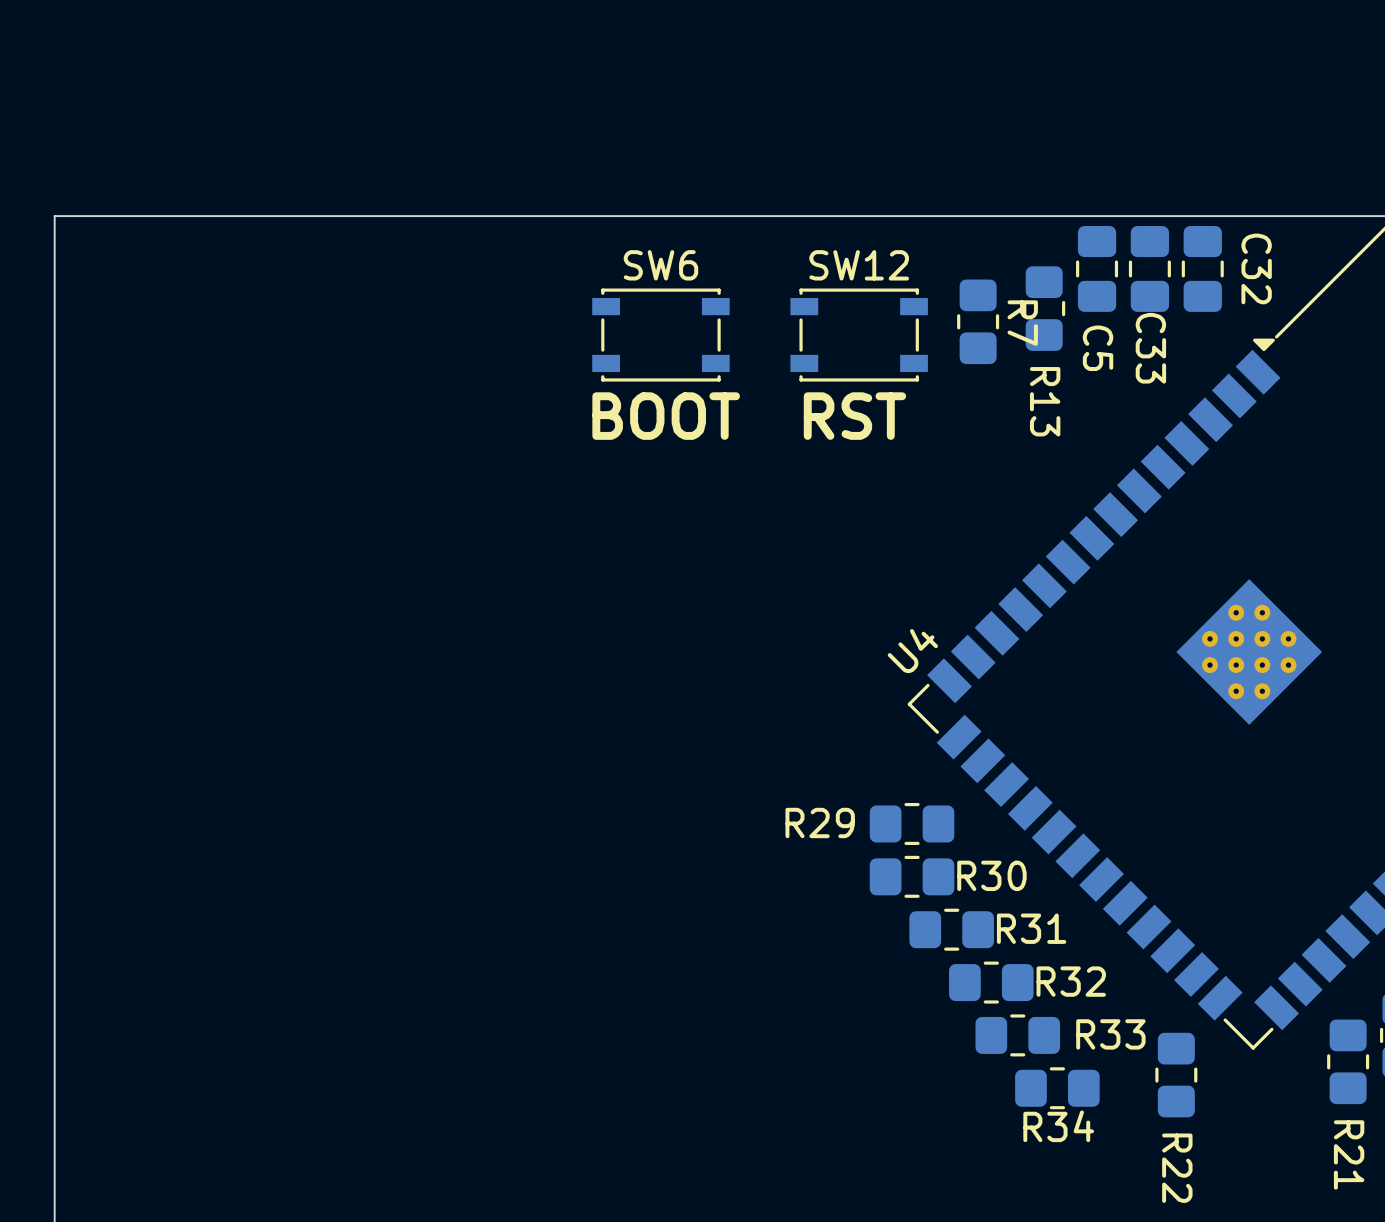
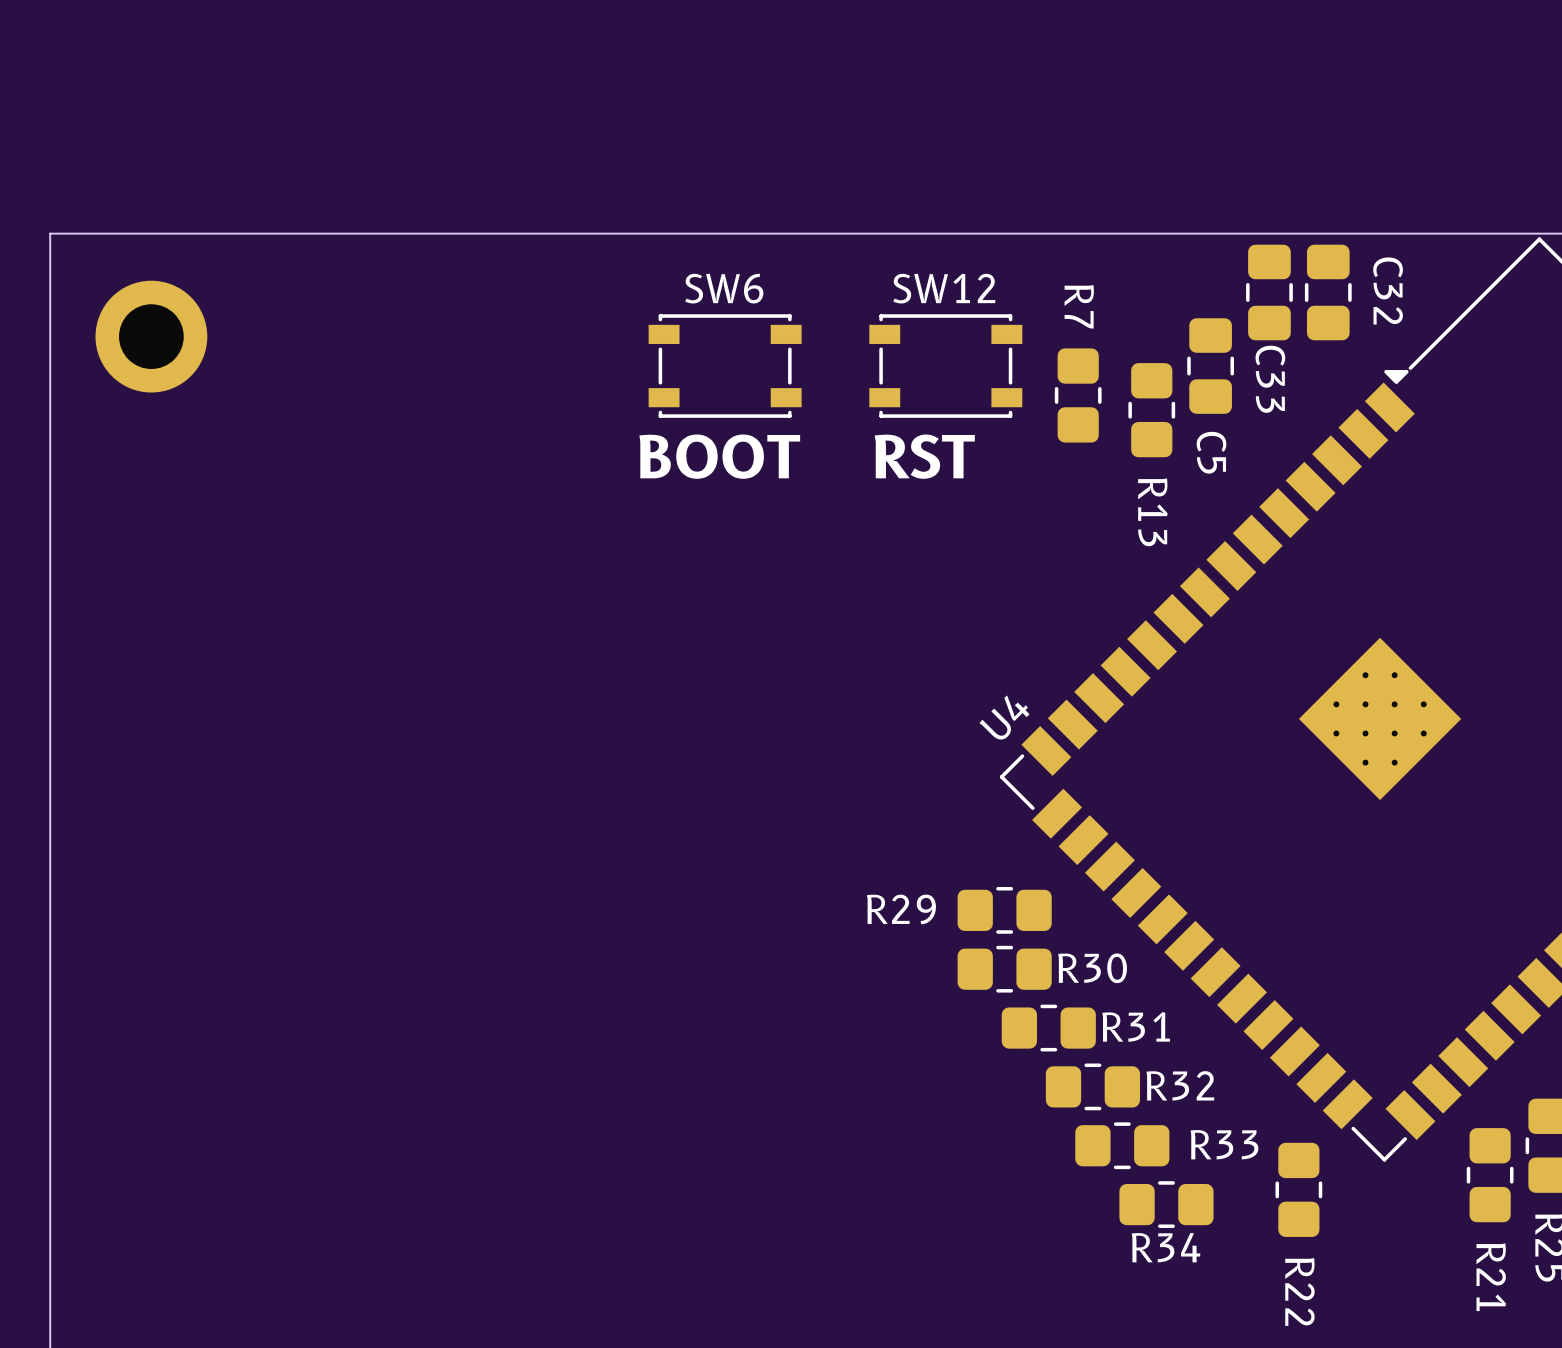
C5 position: (1097, 268) -> (1210, 366)
part: none -> (151, 336)
R13 position: (1044, 308) -> (1151, 410)
R7 position: (978, 321) -> (1078, 395)
R7 name position: R7 (1022, 323) -> R7 (1079, 306)

